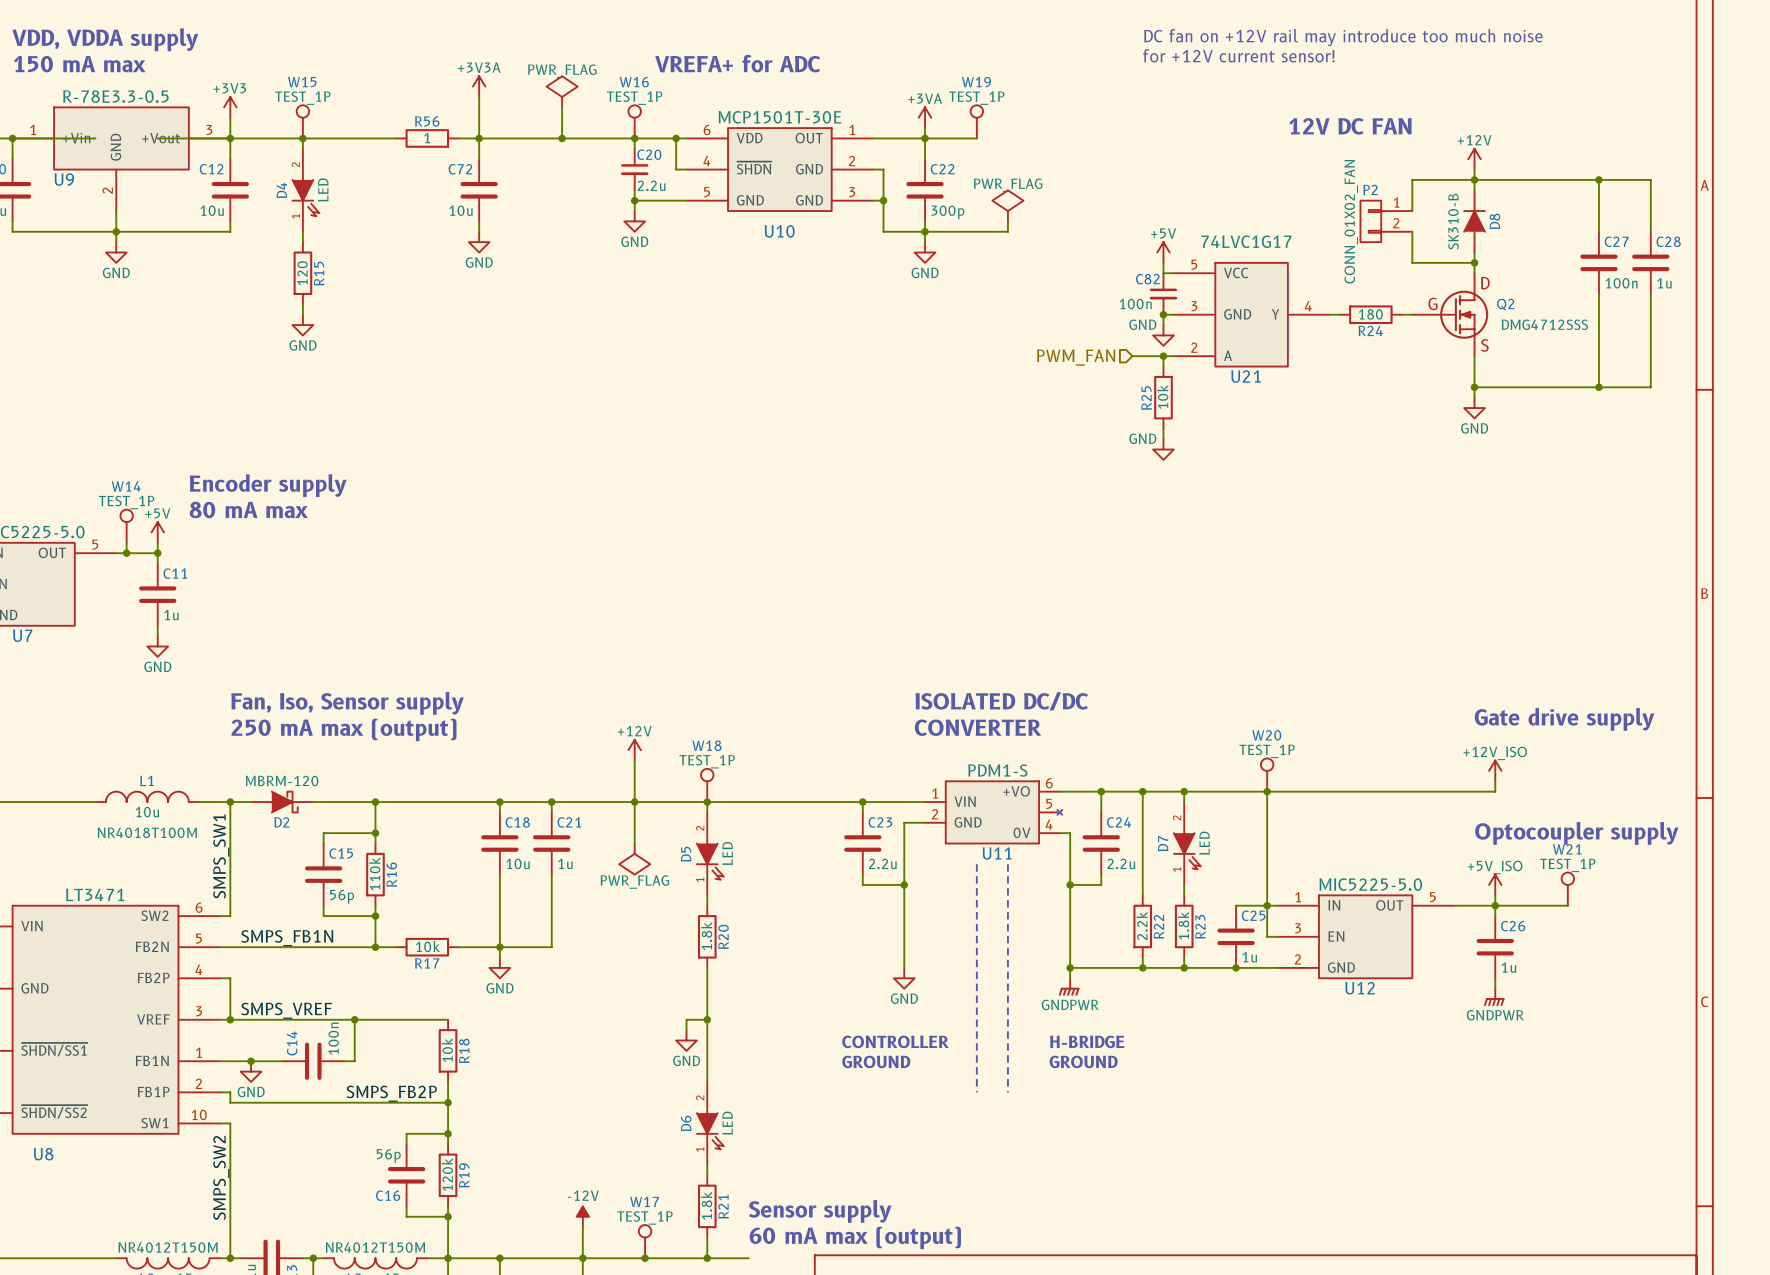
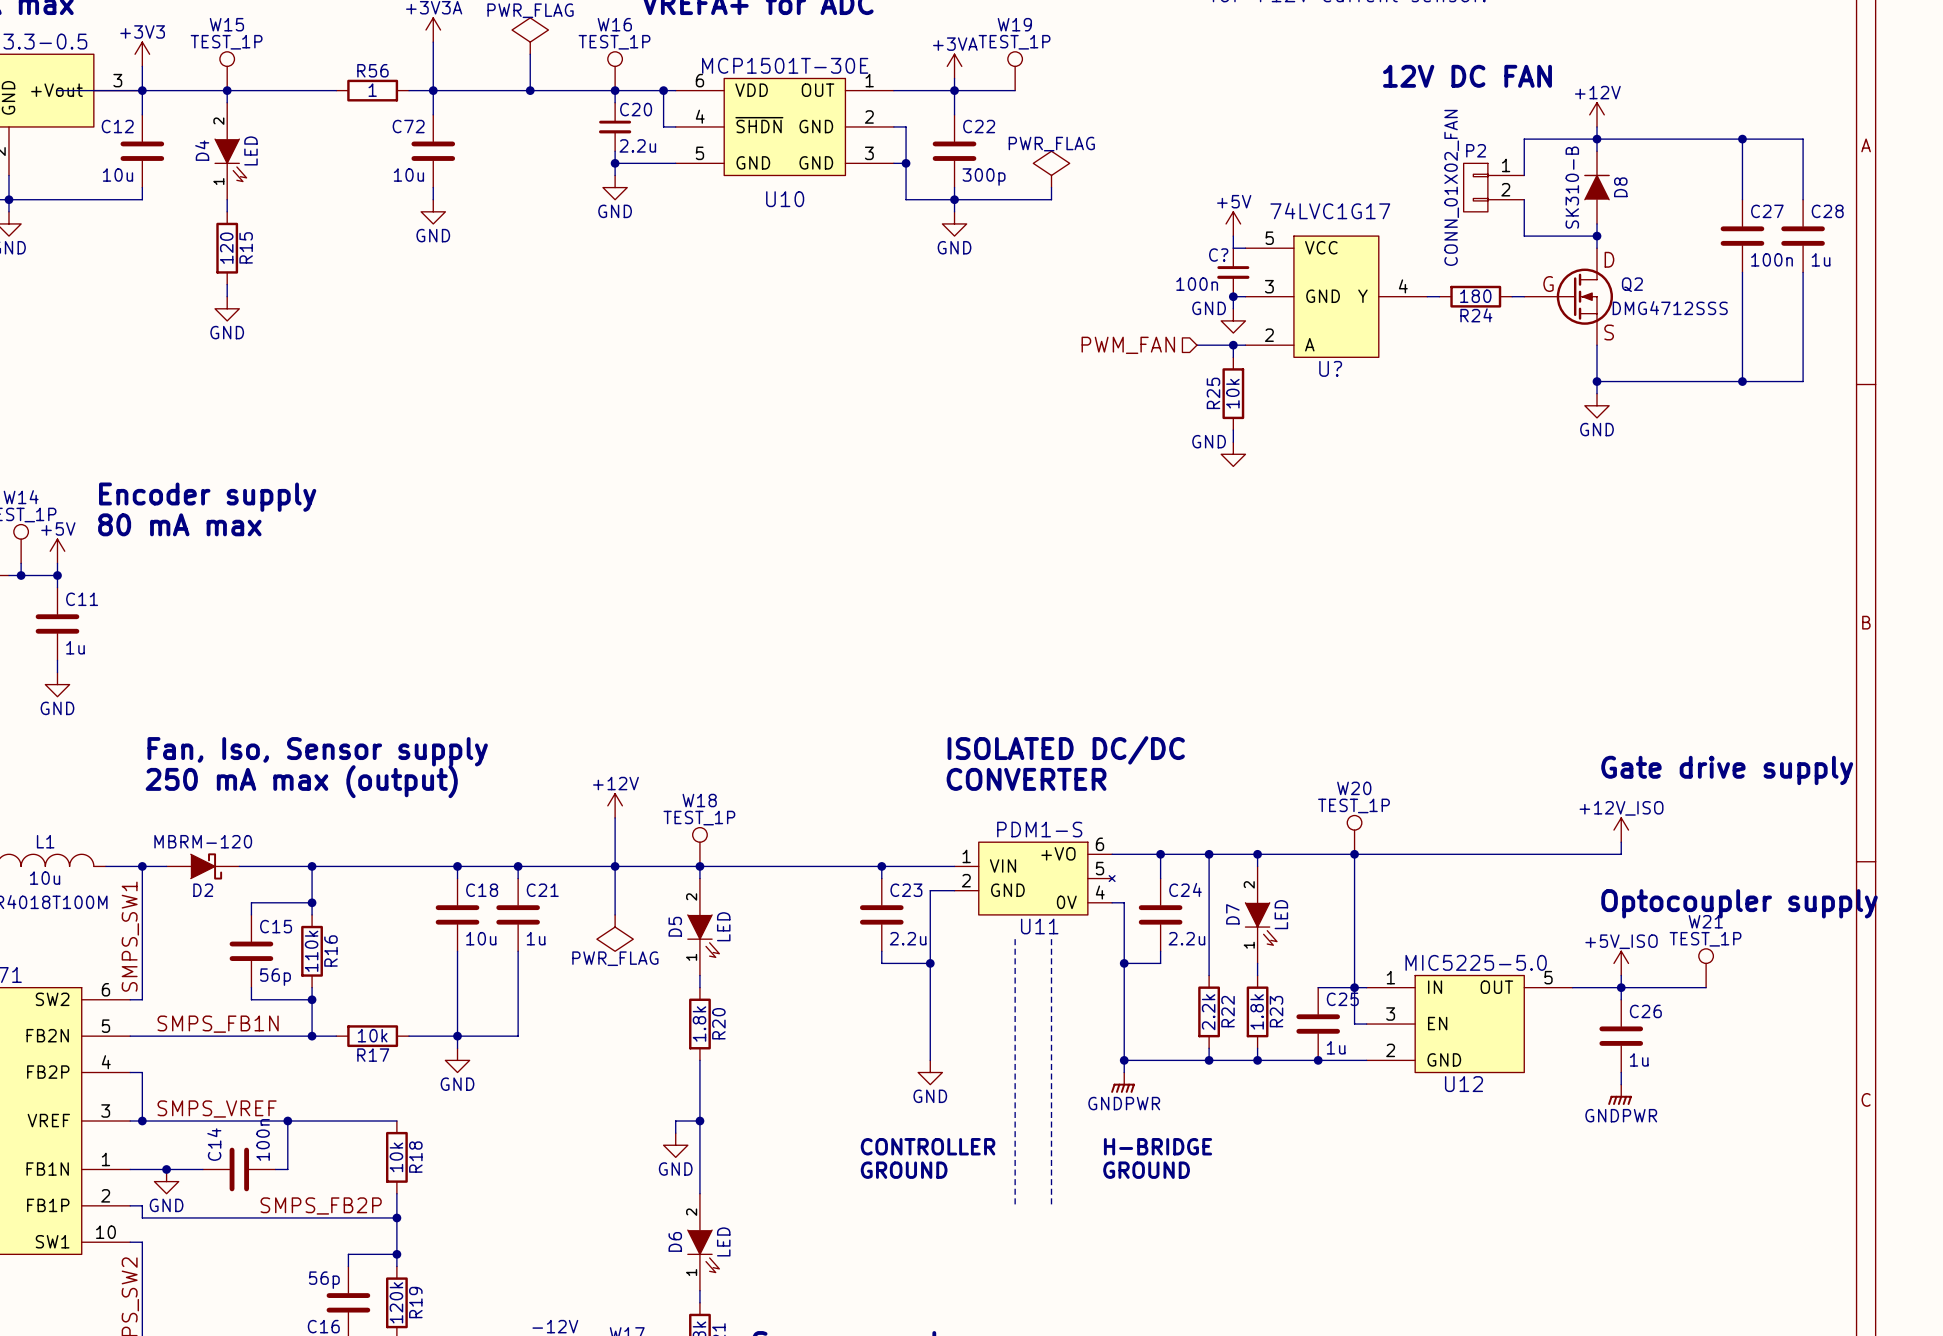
C82 name: C82 (1147, 279) -> C? (1218, 255)
U21 name: U21 (1246, 376) -> U? (1330, 368)

